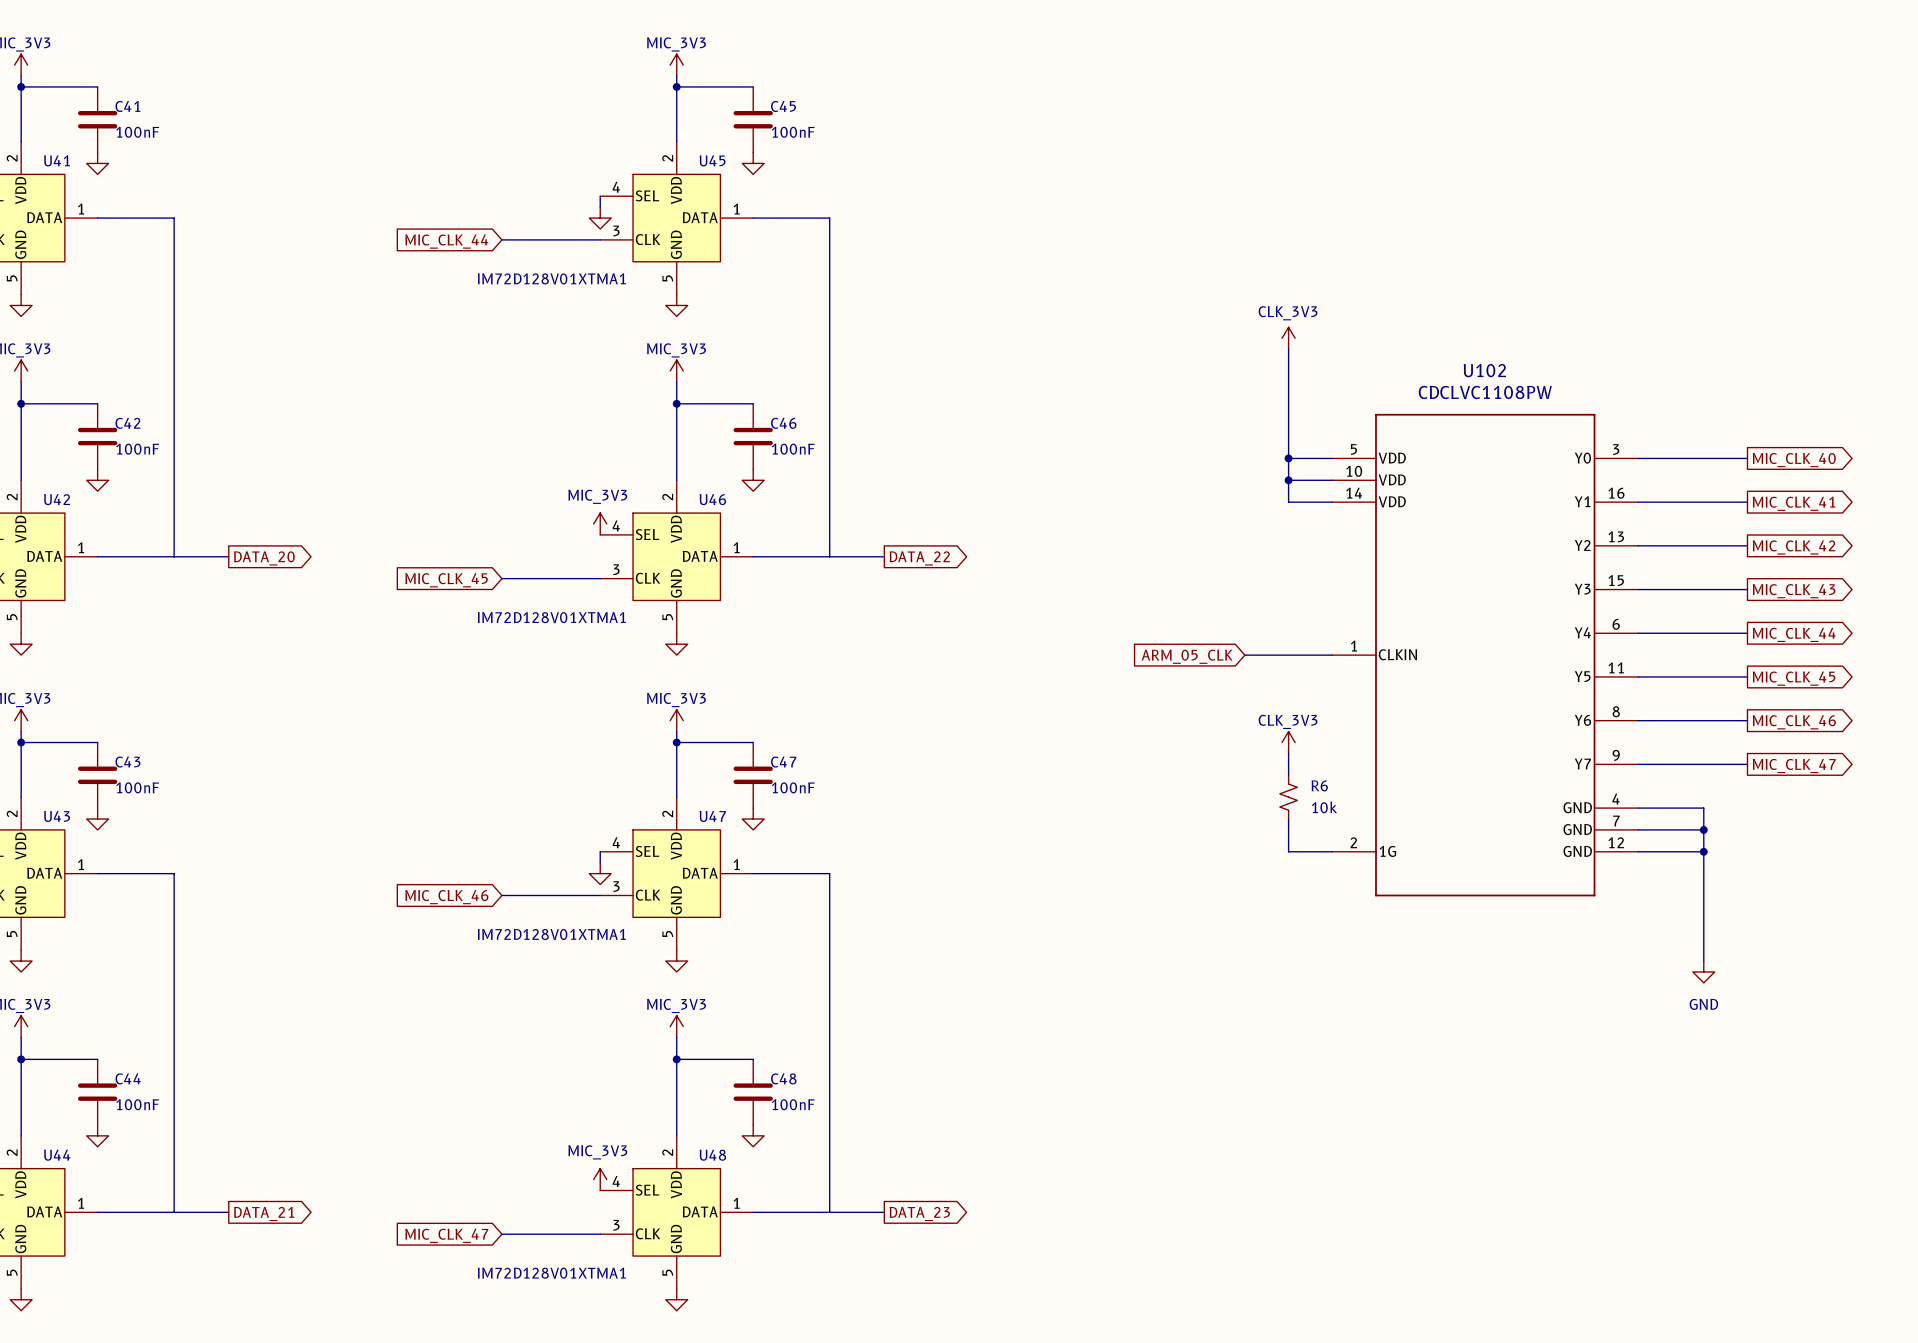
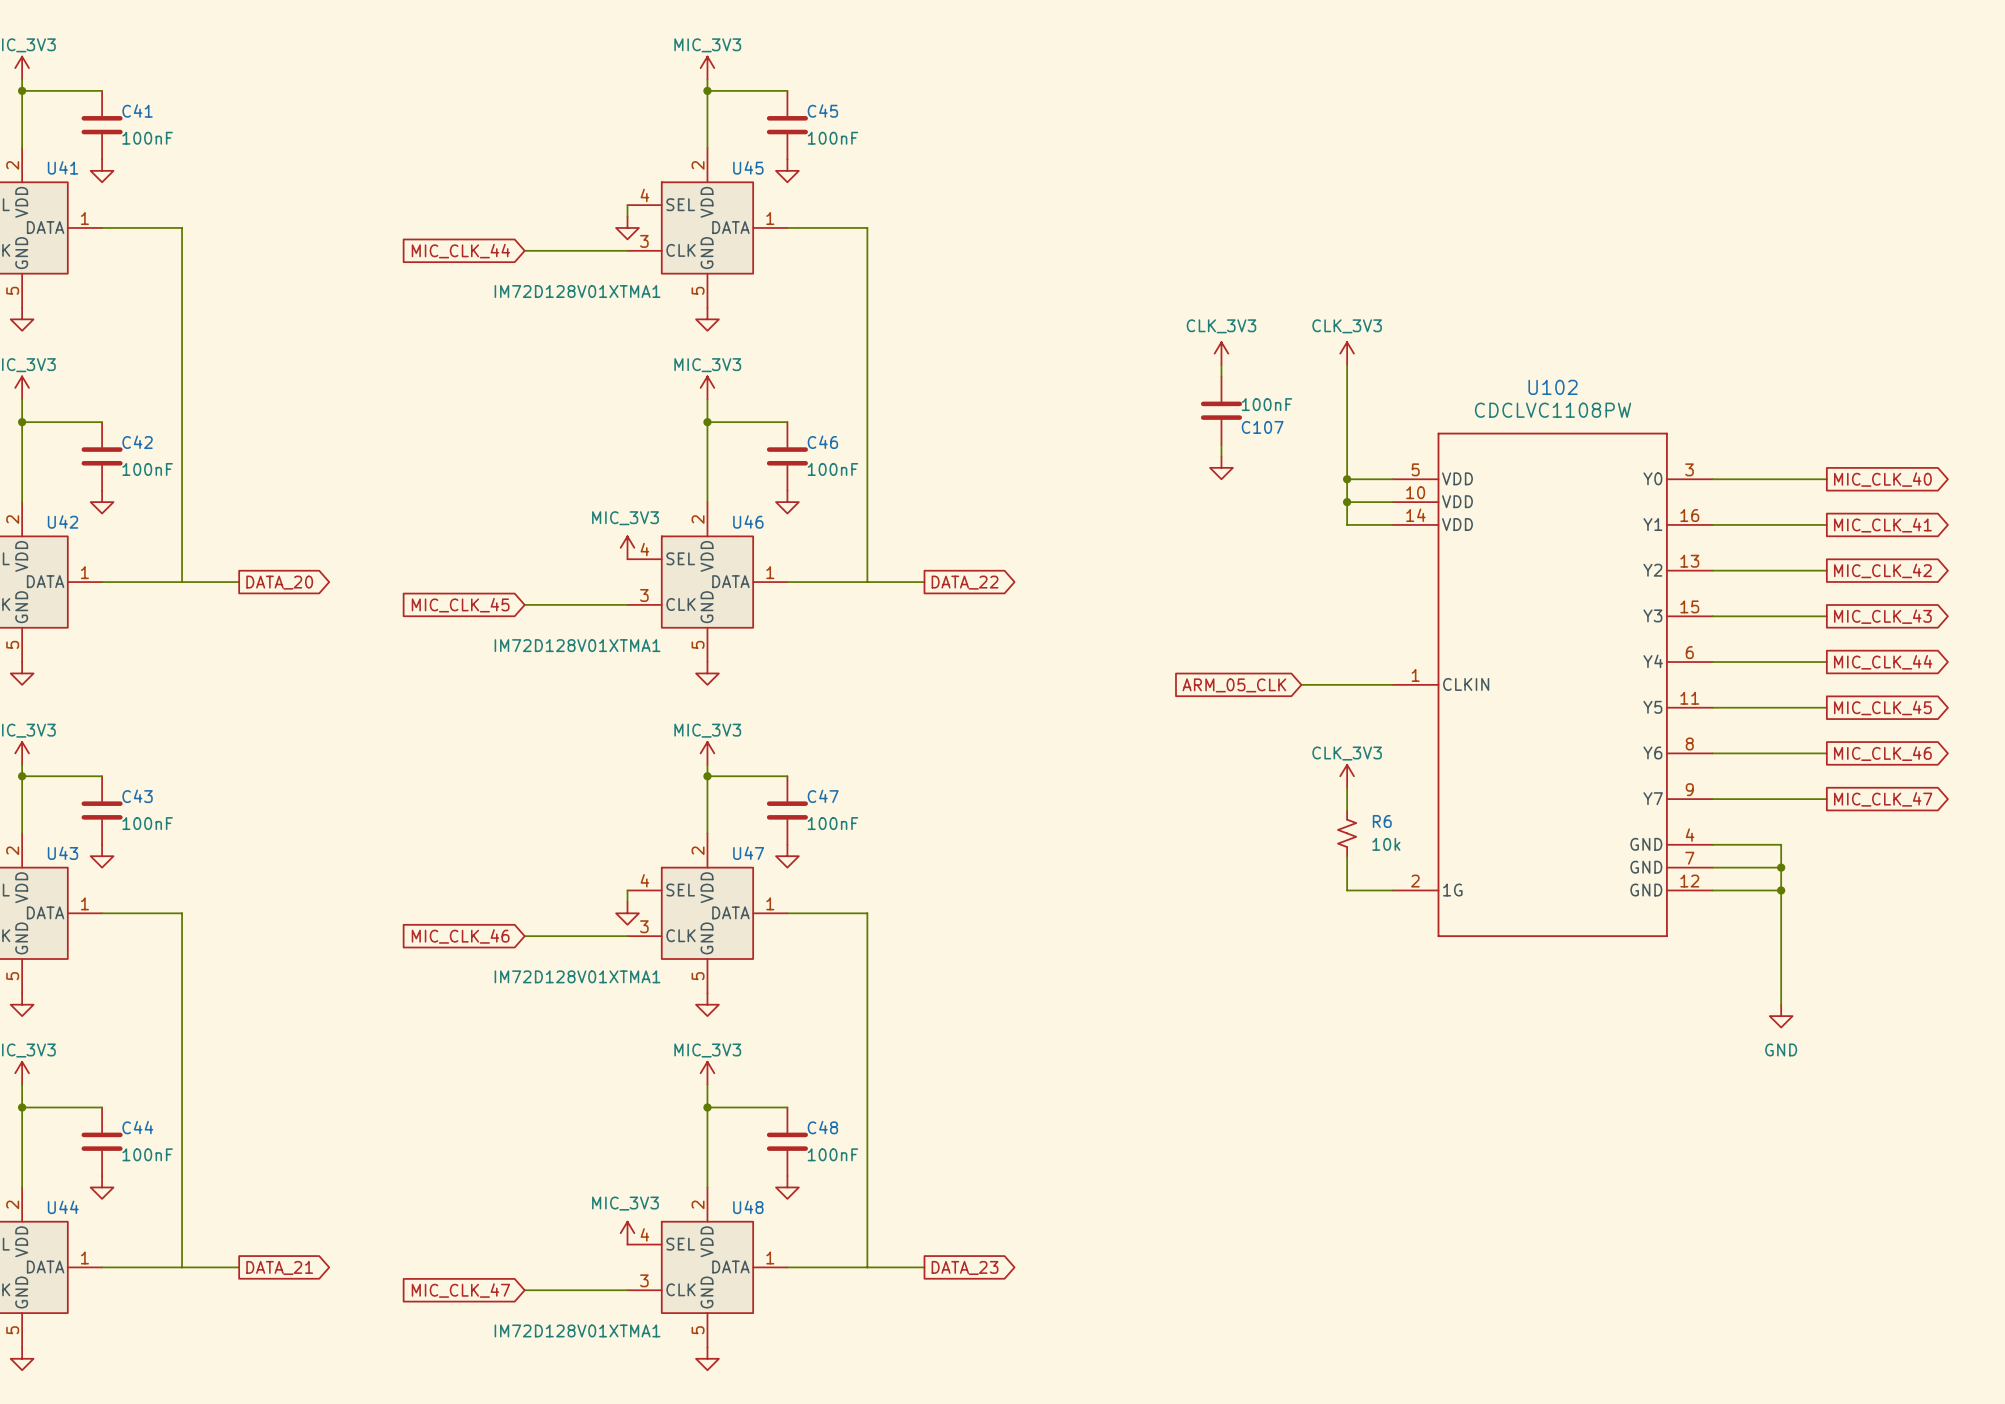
power symbol: none -> CLK_3V3 (1221, 353)
wire: none -> (1221, 365) (1221, 376)
C107: none -> 100nF (1221, 410)
wire: none -> (1221, 445) (1221, 456)
power symbol: none -> (1221, 467)

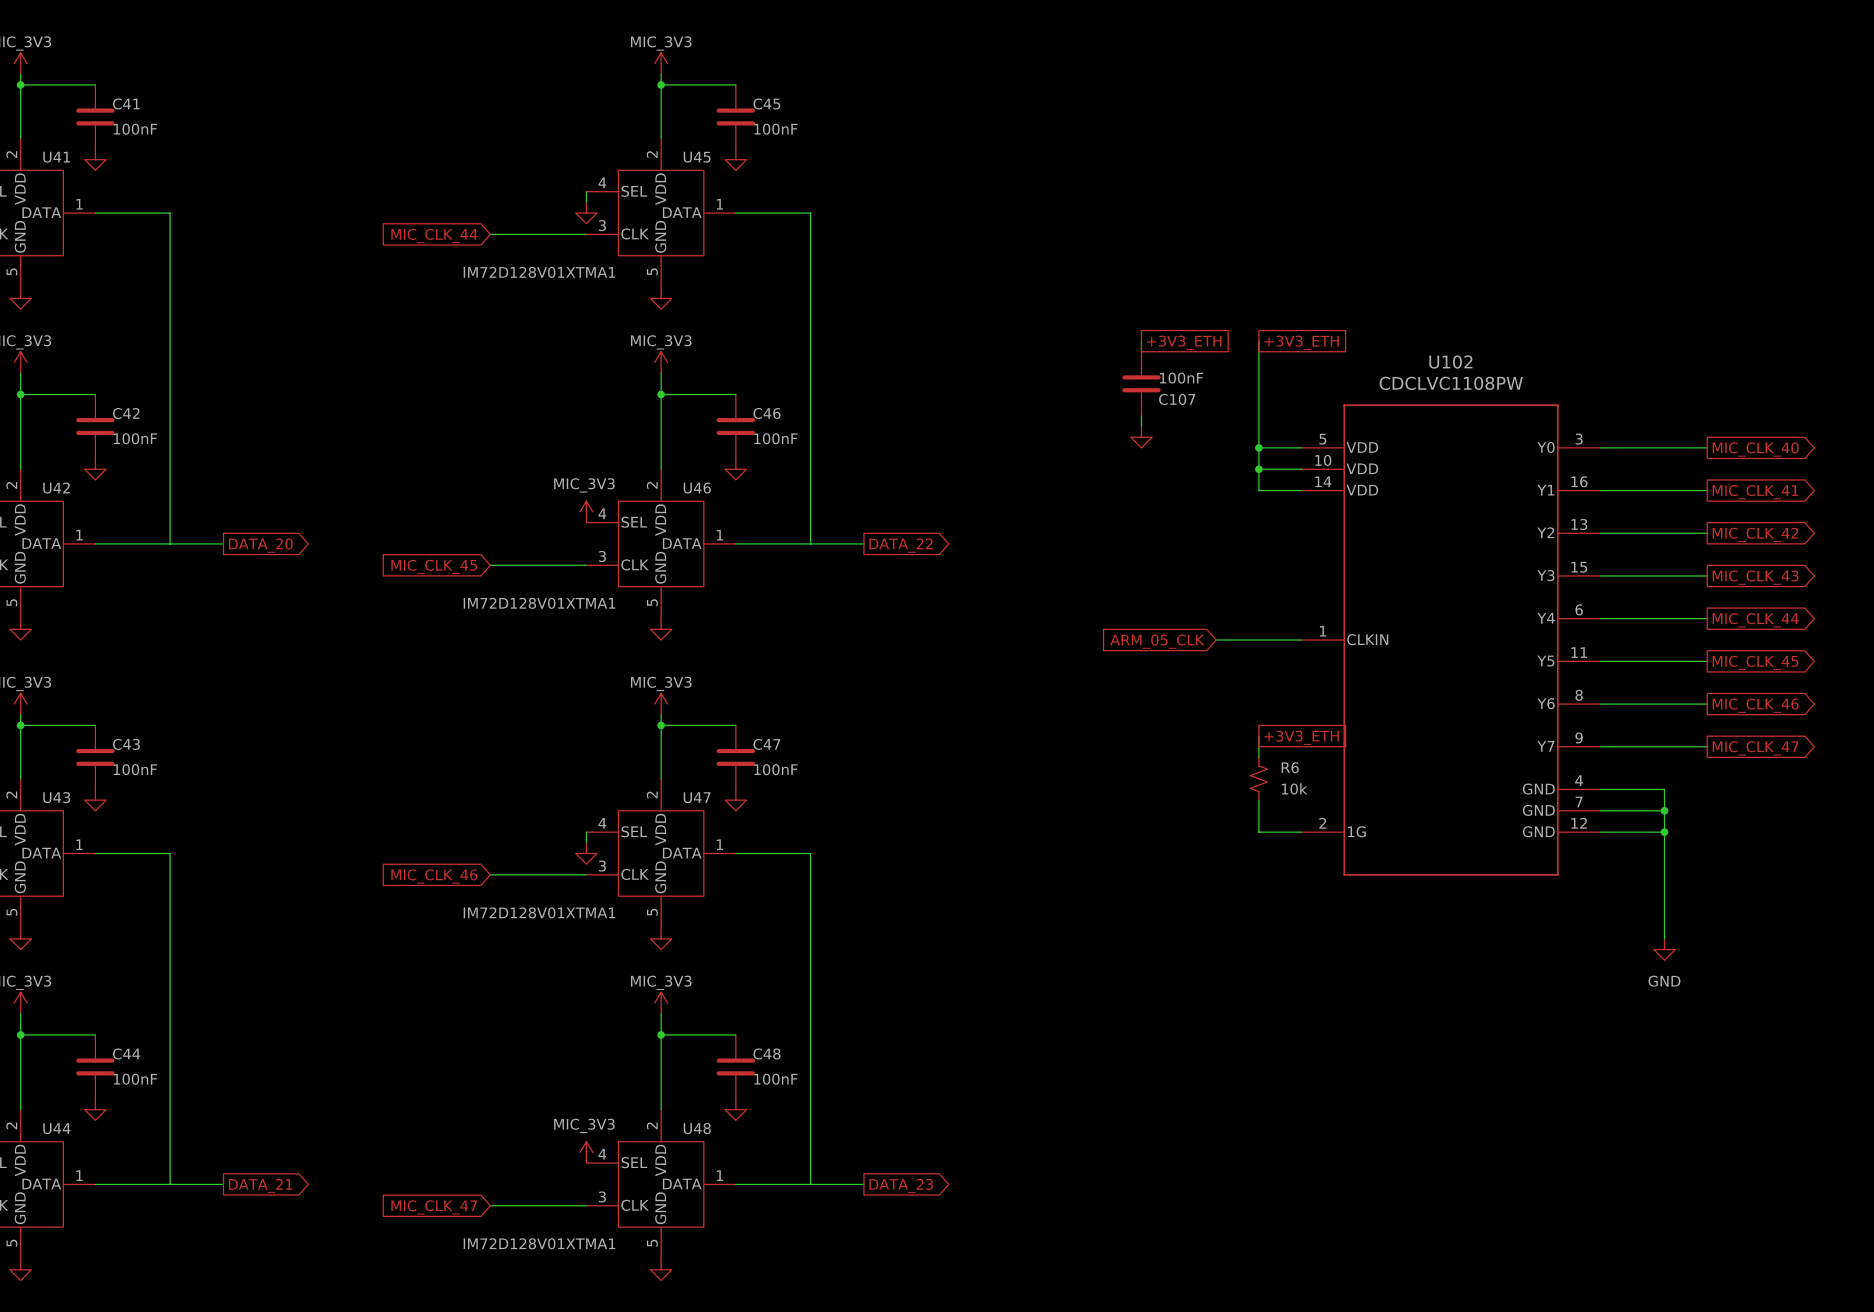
power symbol: CLK_3V3 (1221, 353) -> none
power symbol: CLK_3V3 (1347, 353) -> none
global label: none -> +3V3_ETH (1184, 342)
global label: none -> +3V3_ETH (1301, 342)
power symbol: CLK_3V3 (1347, 776) -> none
global label: none -> +3V3_ETH (1301, 737)

